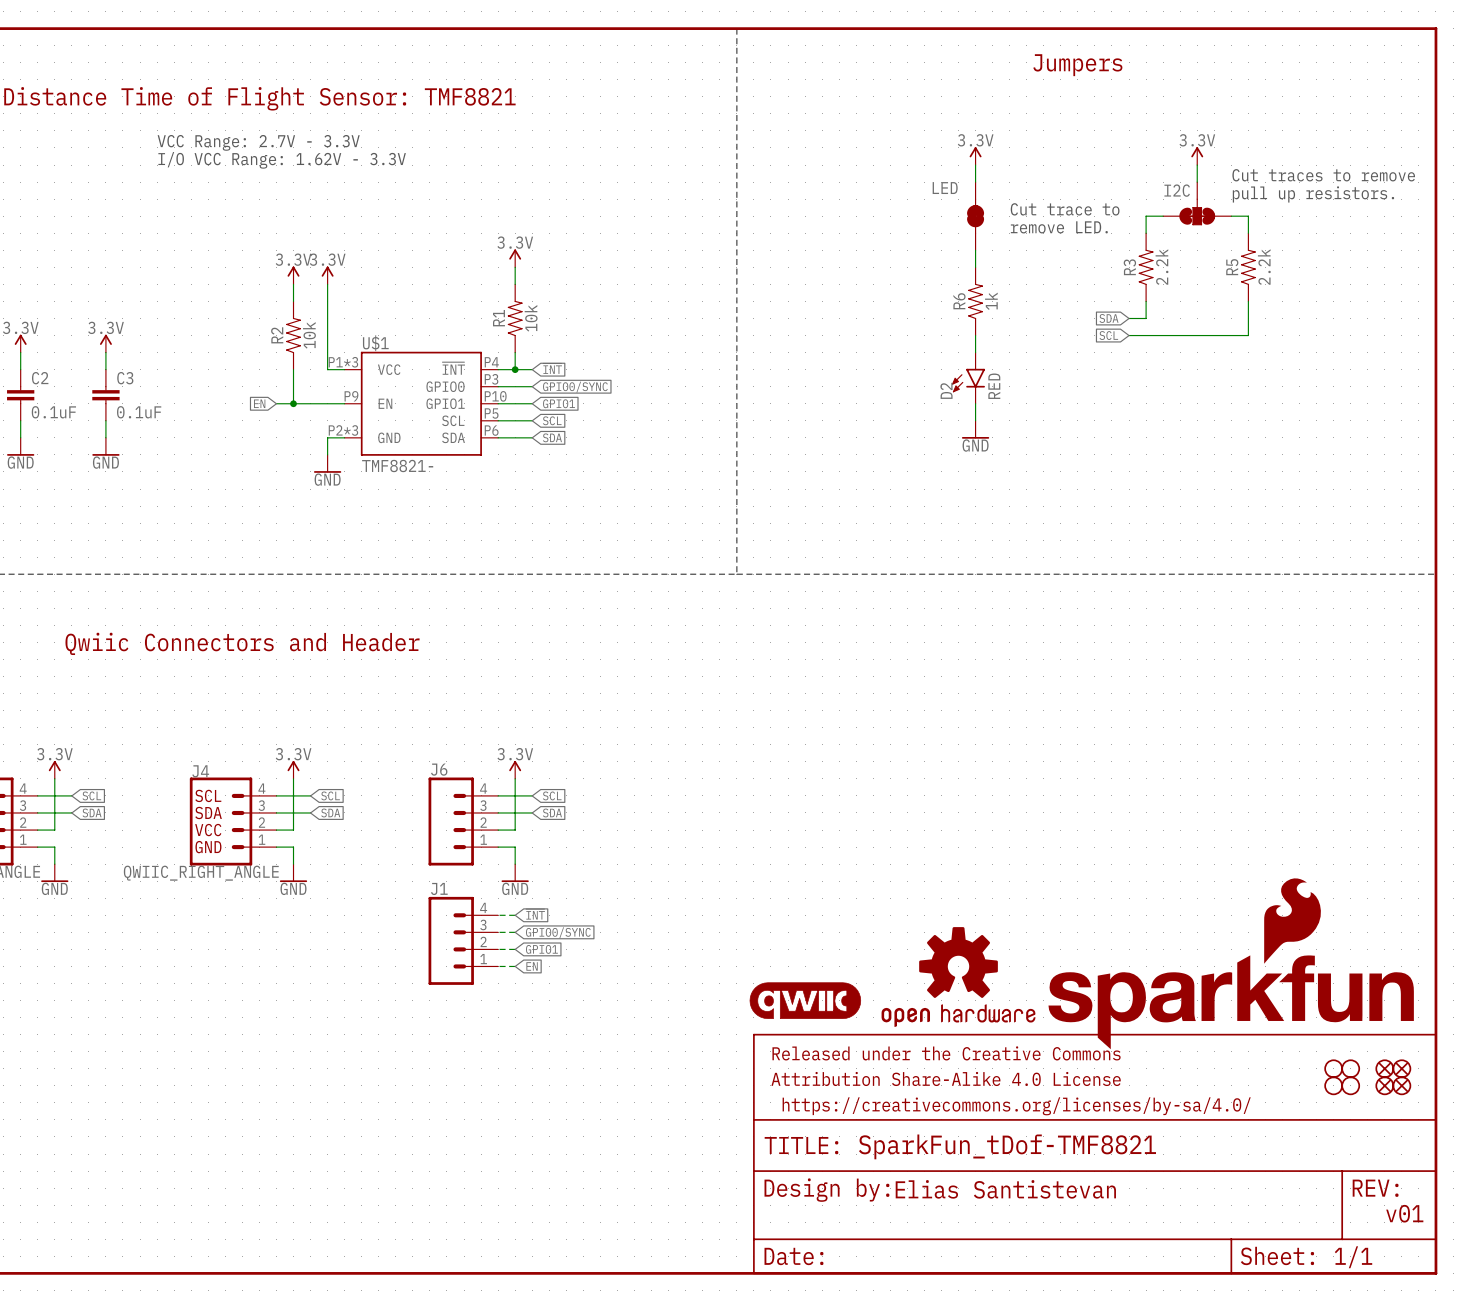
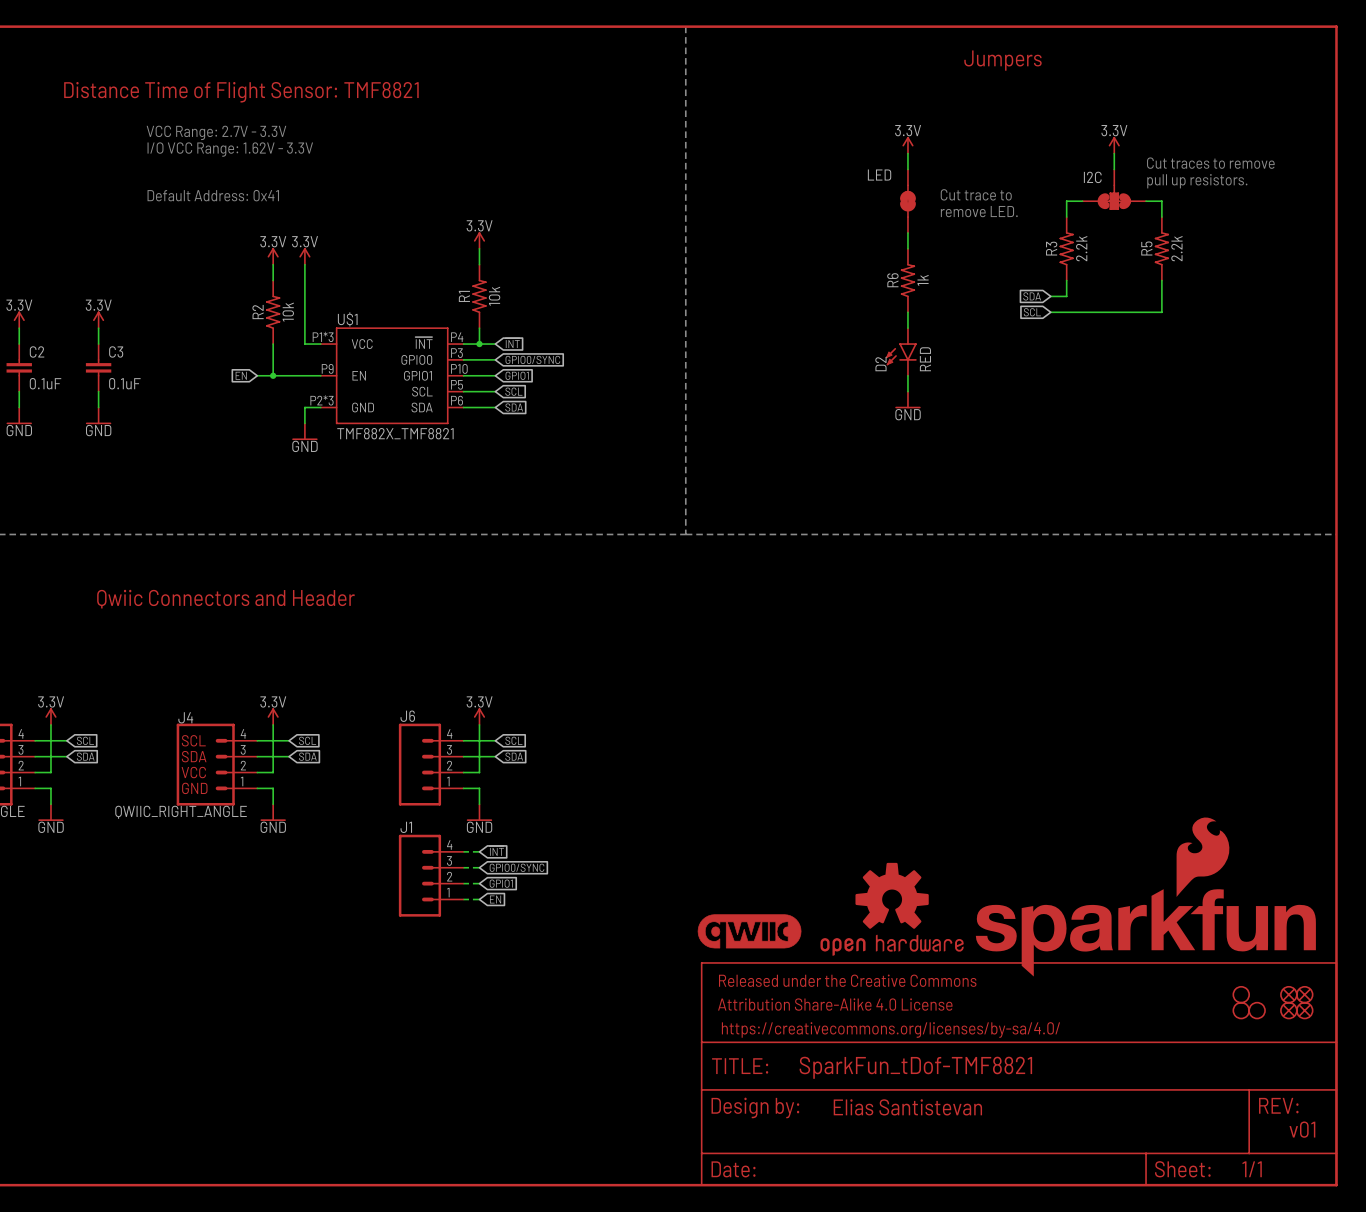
text: none -> Default Address: 0x41 (213, 195)
U$1 value: TMF8821- (397, 465) -> TMF882X_TMF8821 (395, 433)
part: (1350, 1068) -> none

